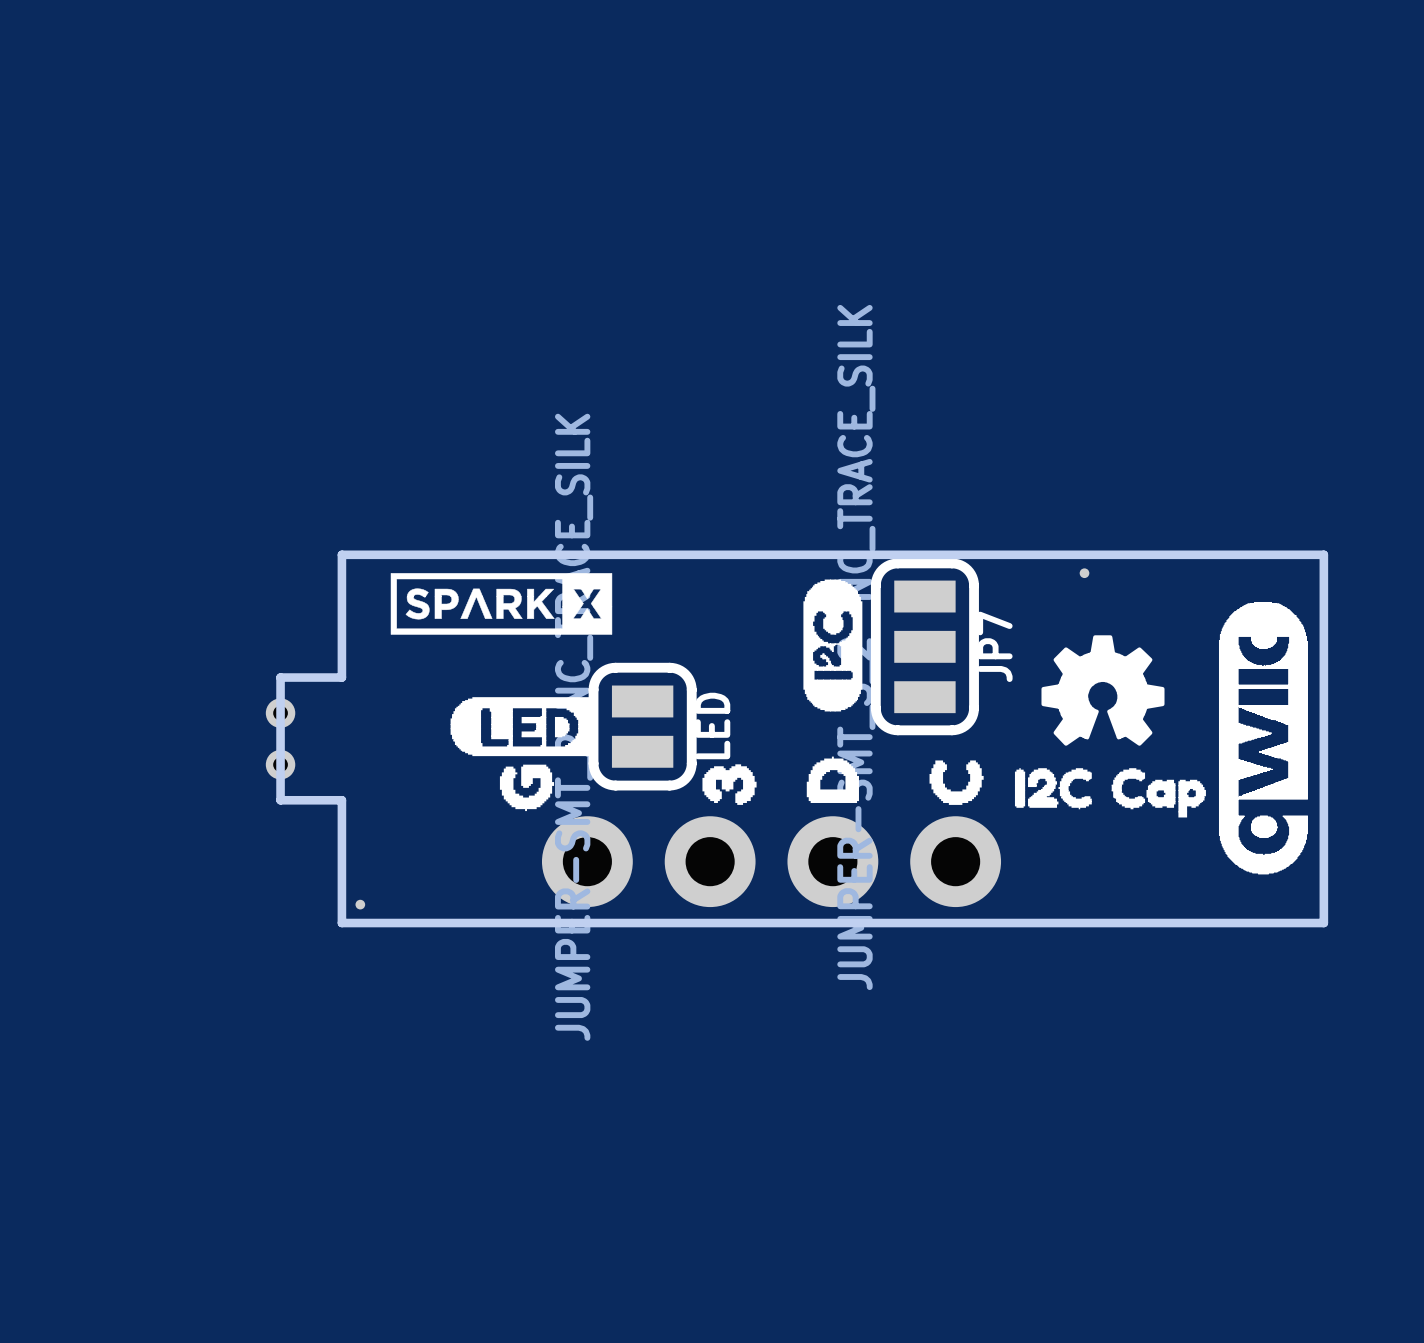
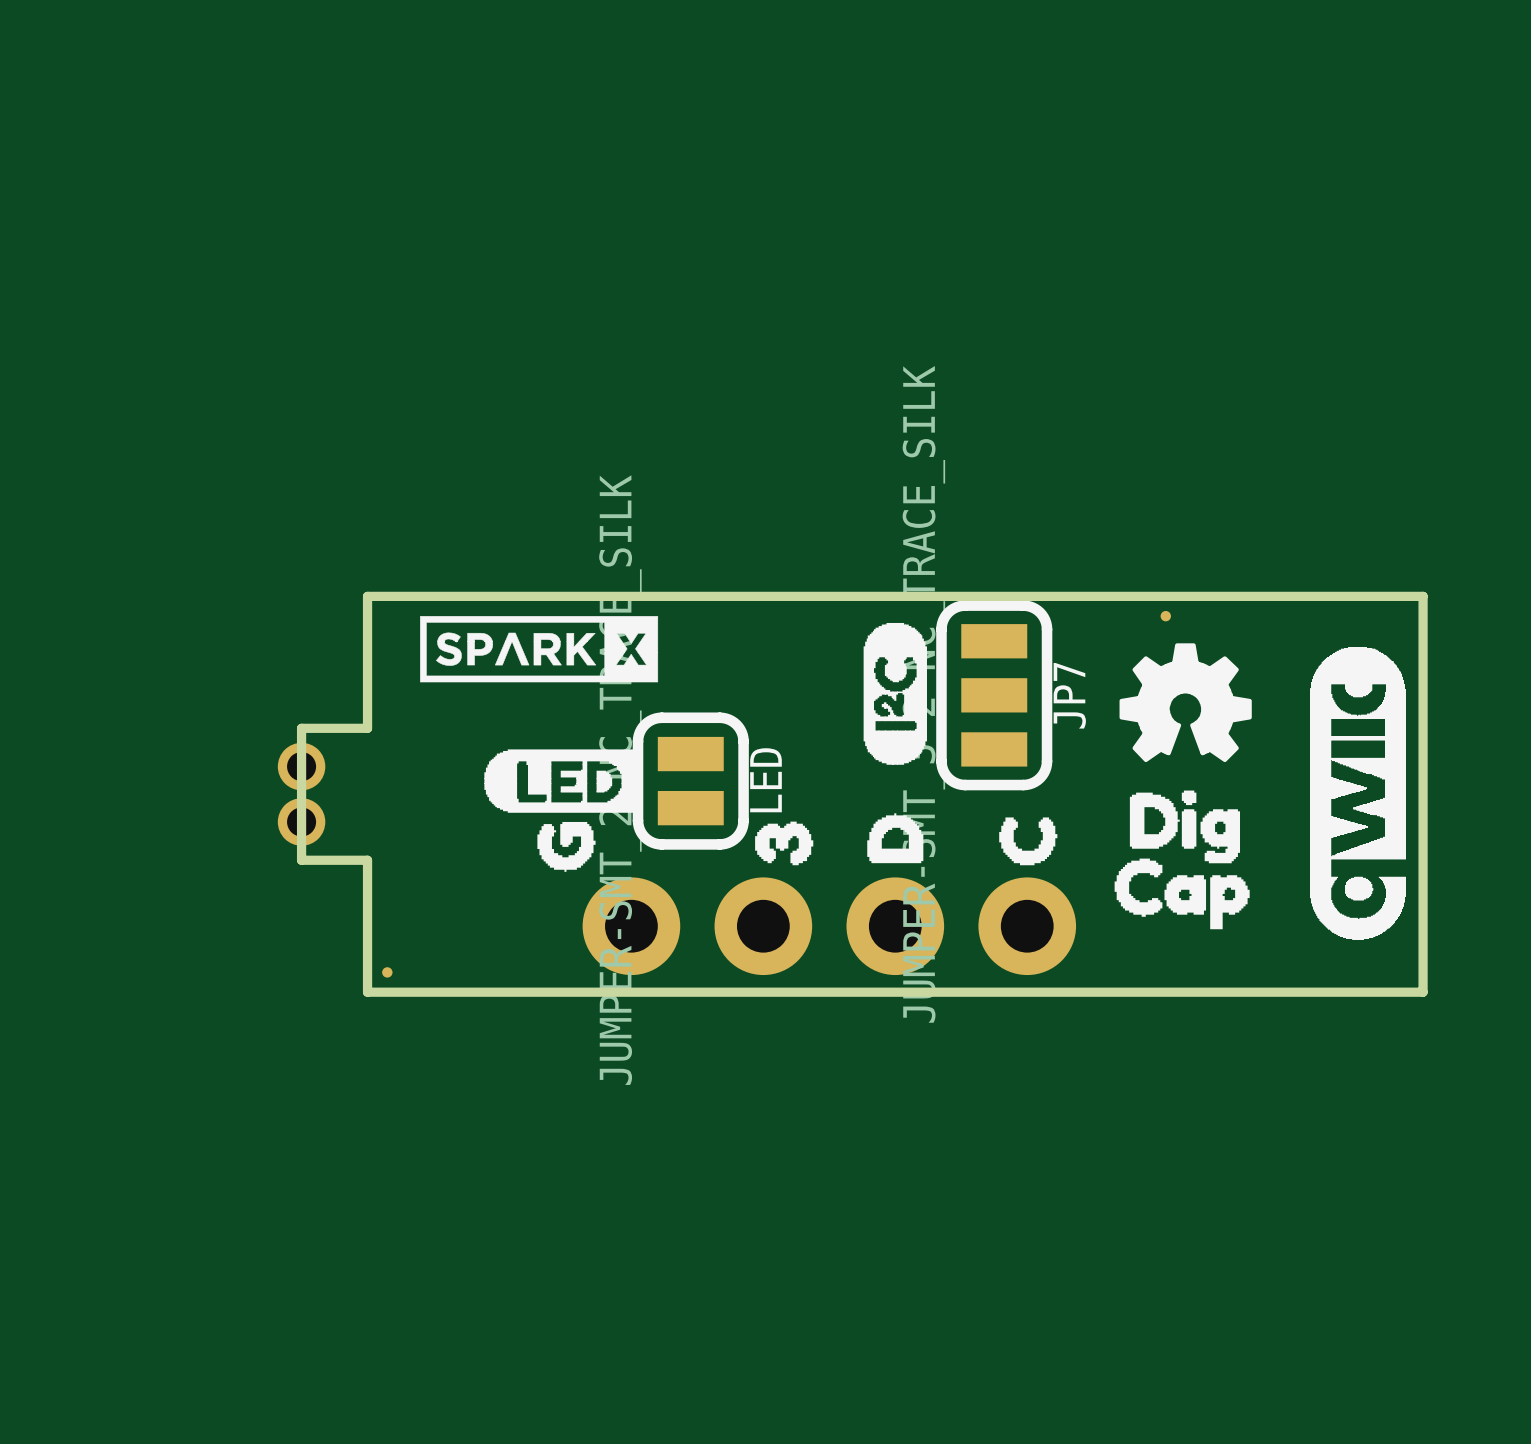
drawing position: (1102, 690) -> (1185, 702)
part footprint: [265, 698, 296, 780] -> [277, 742, 326, 846]
drawing: none -> [1114, 790, 1250, 930]
drawing: [1014, 768, 1206, 818] -> none

